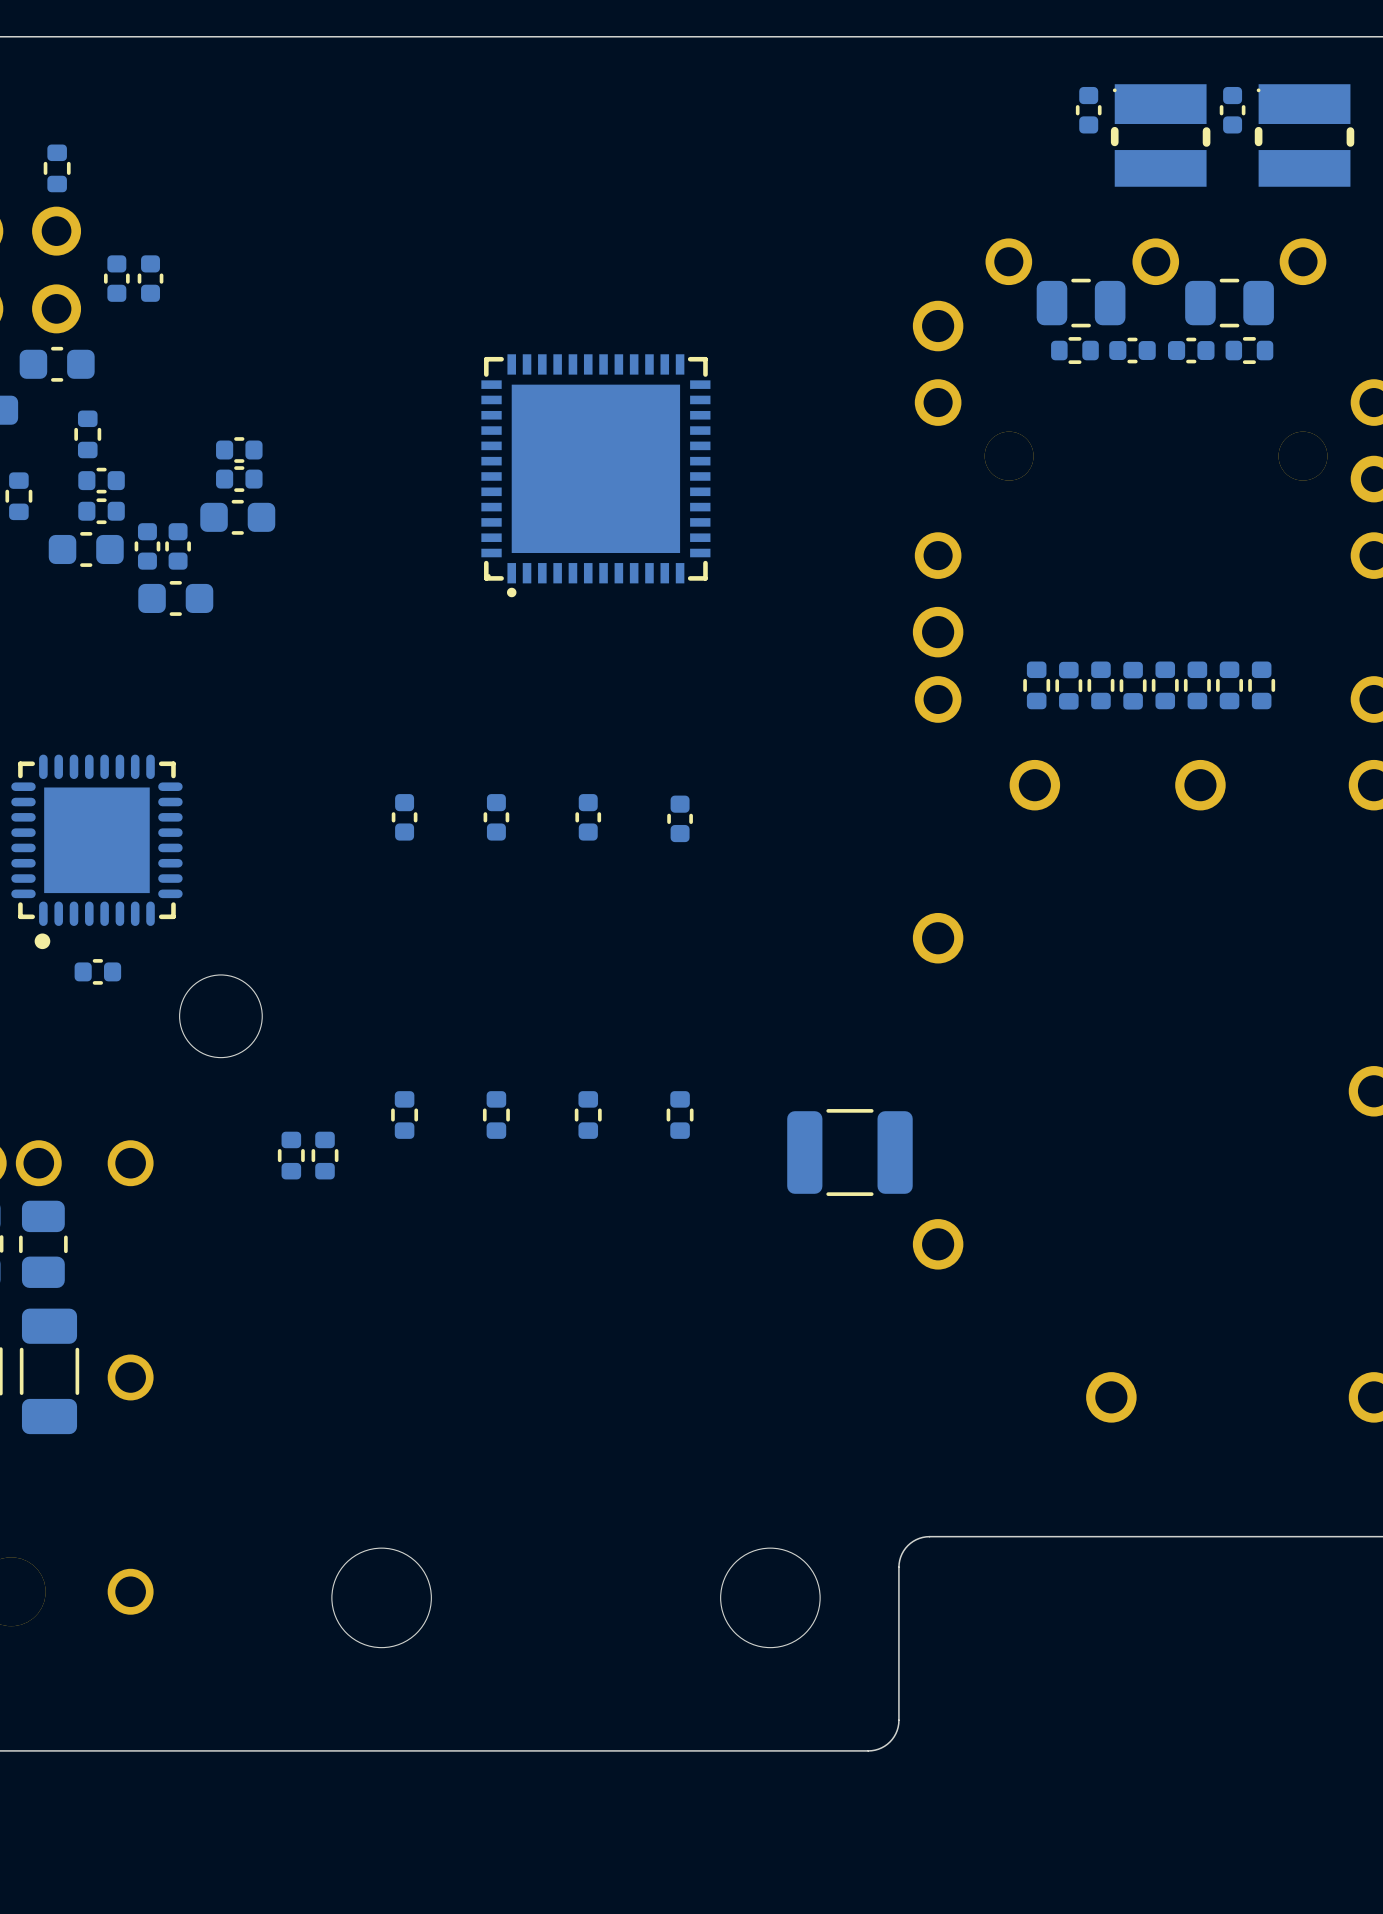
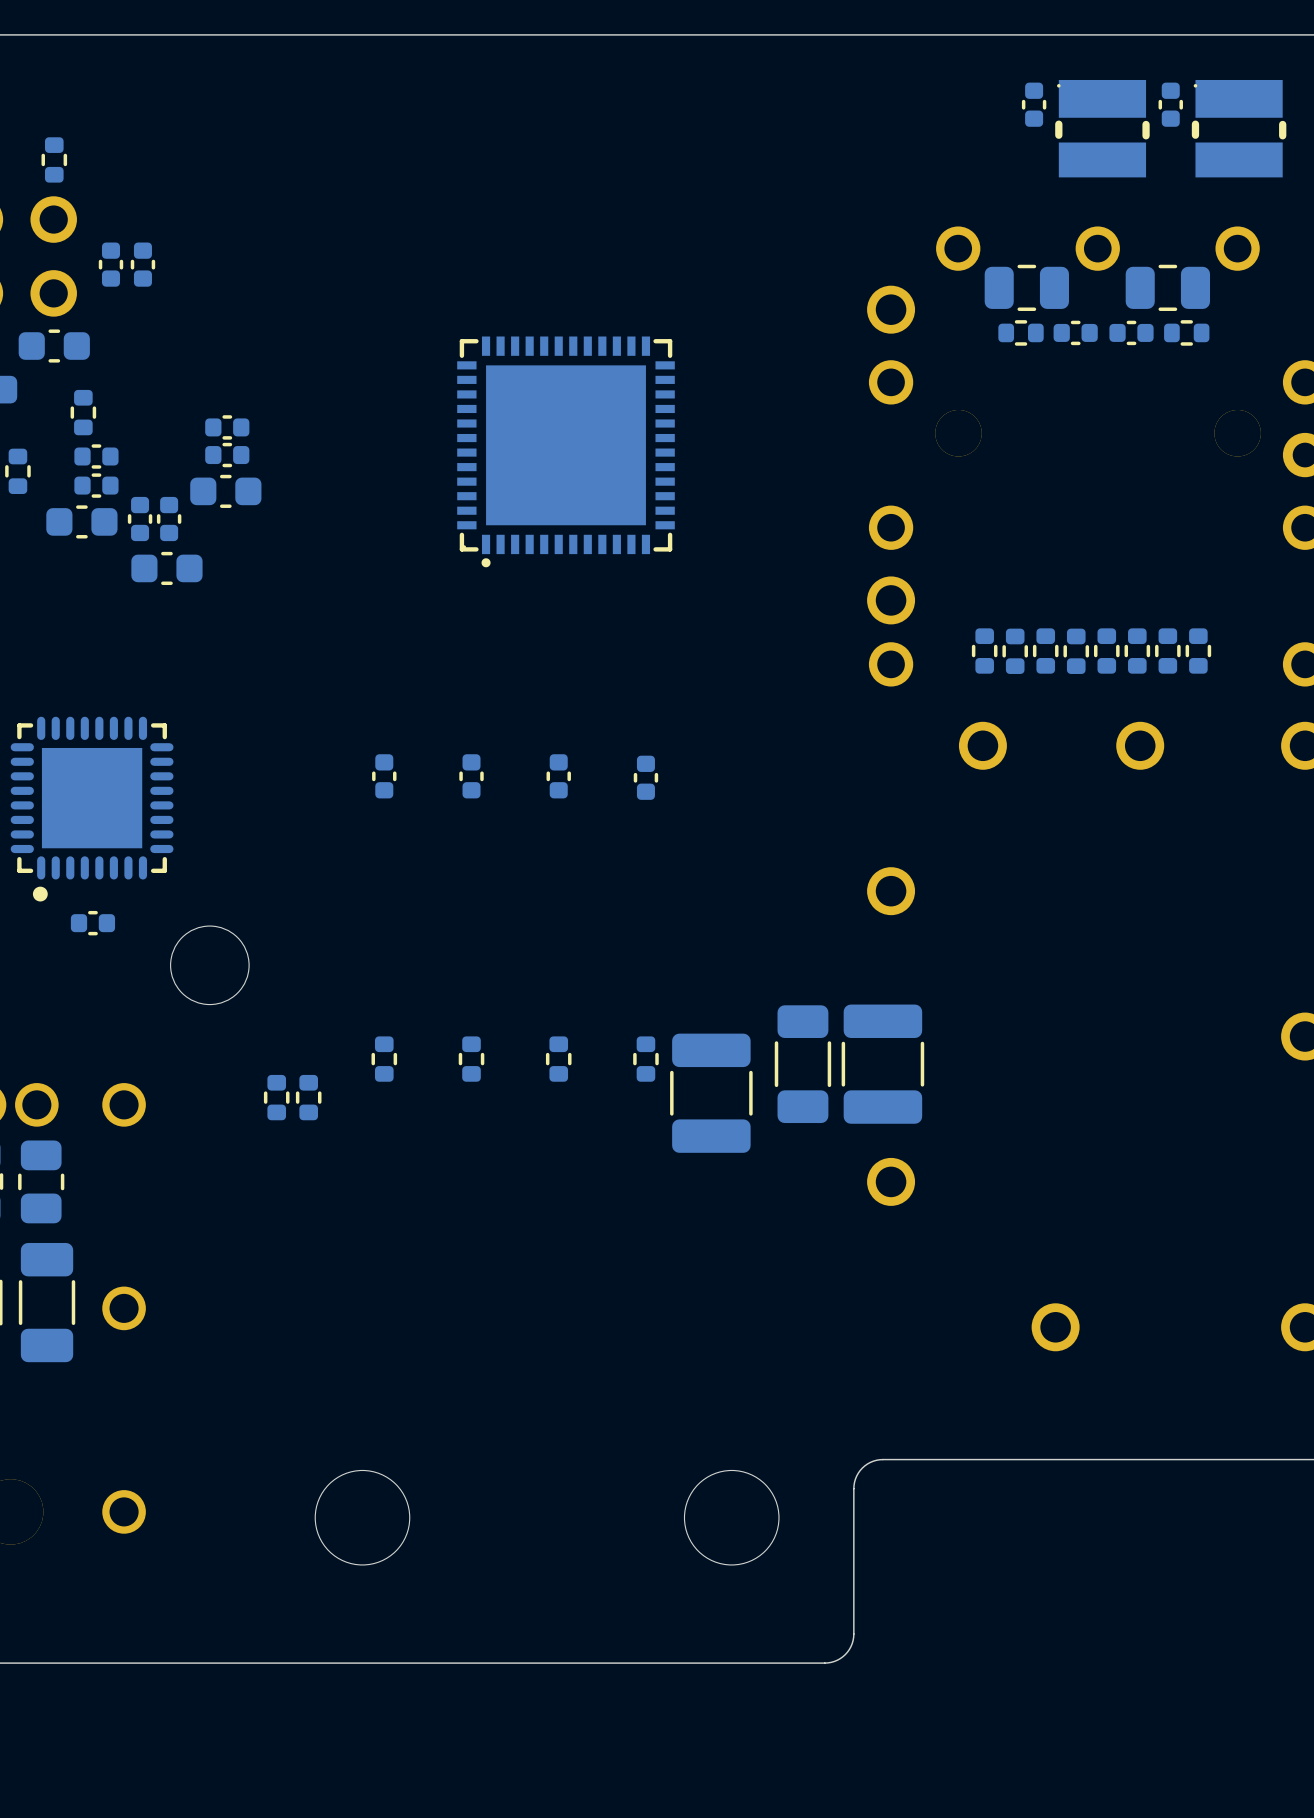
part: none -> (802, 1064)
part: none -> (882, 1064)
part: none -> (711, 1093)
part: (849, 1152) -> none

